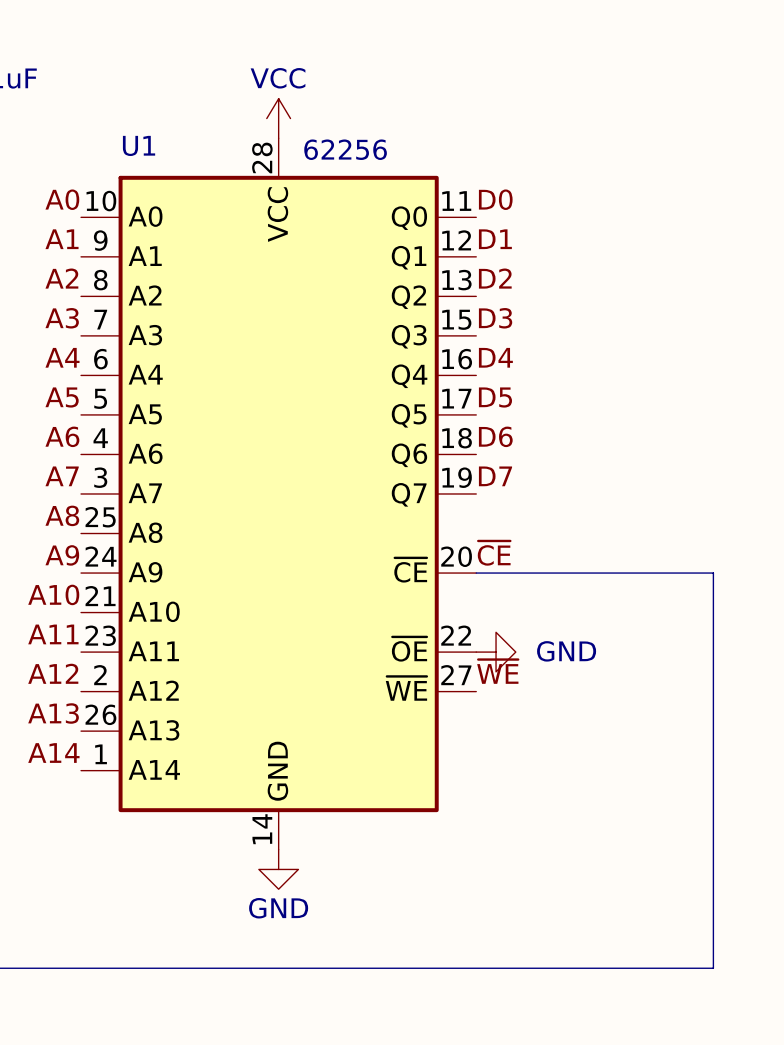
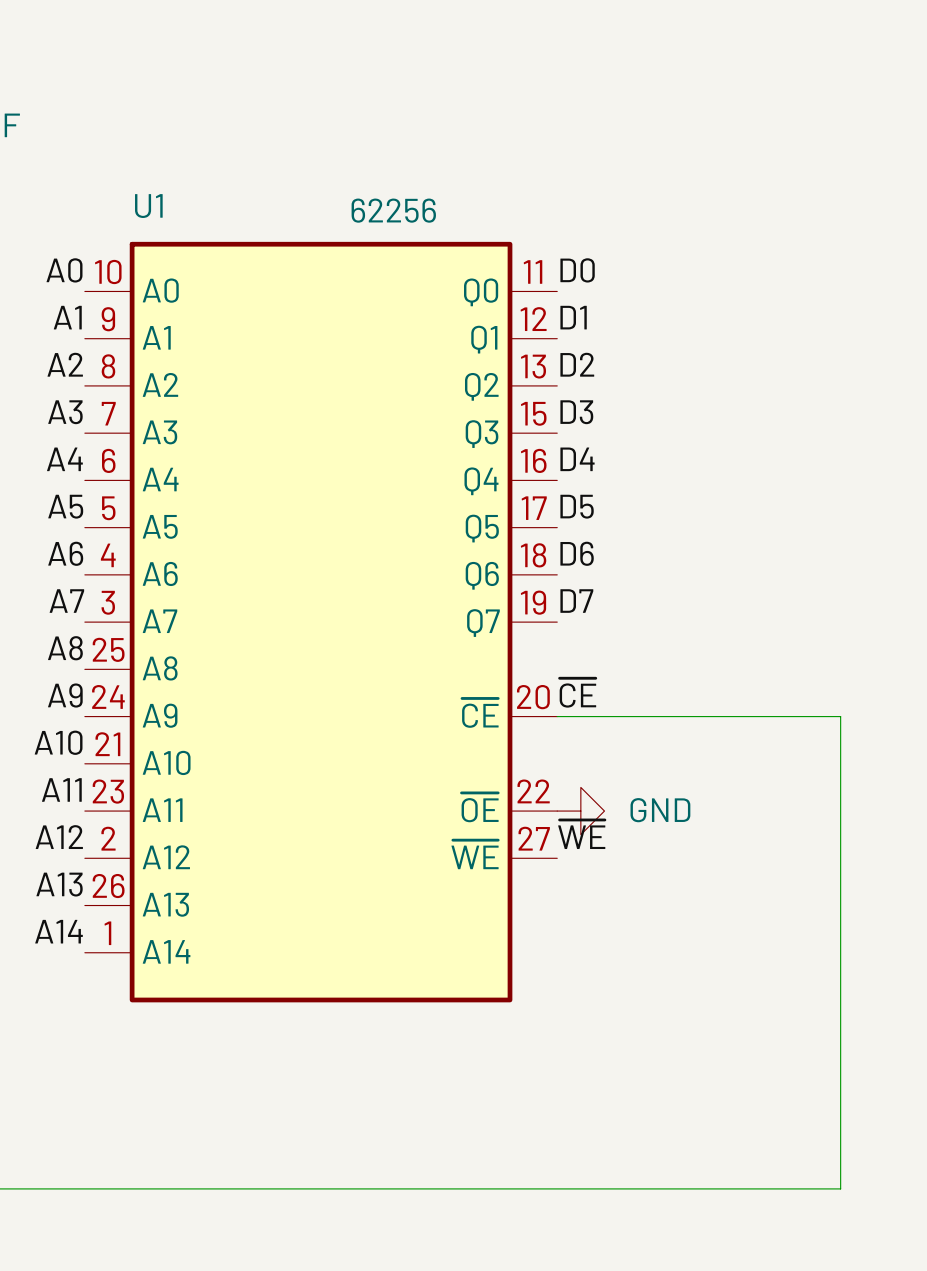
power symbol: VCC (278, 118) -> none
U1 symbol: [81, 138, 477, 850] -> [84, 241, 558, 1003]
power symbol: GND (278, 869) -> none

